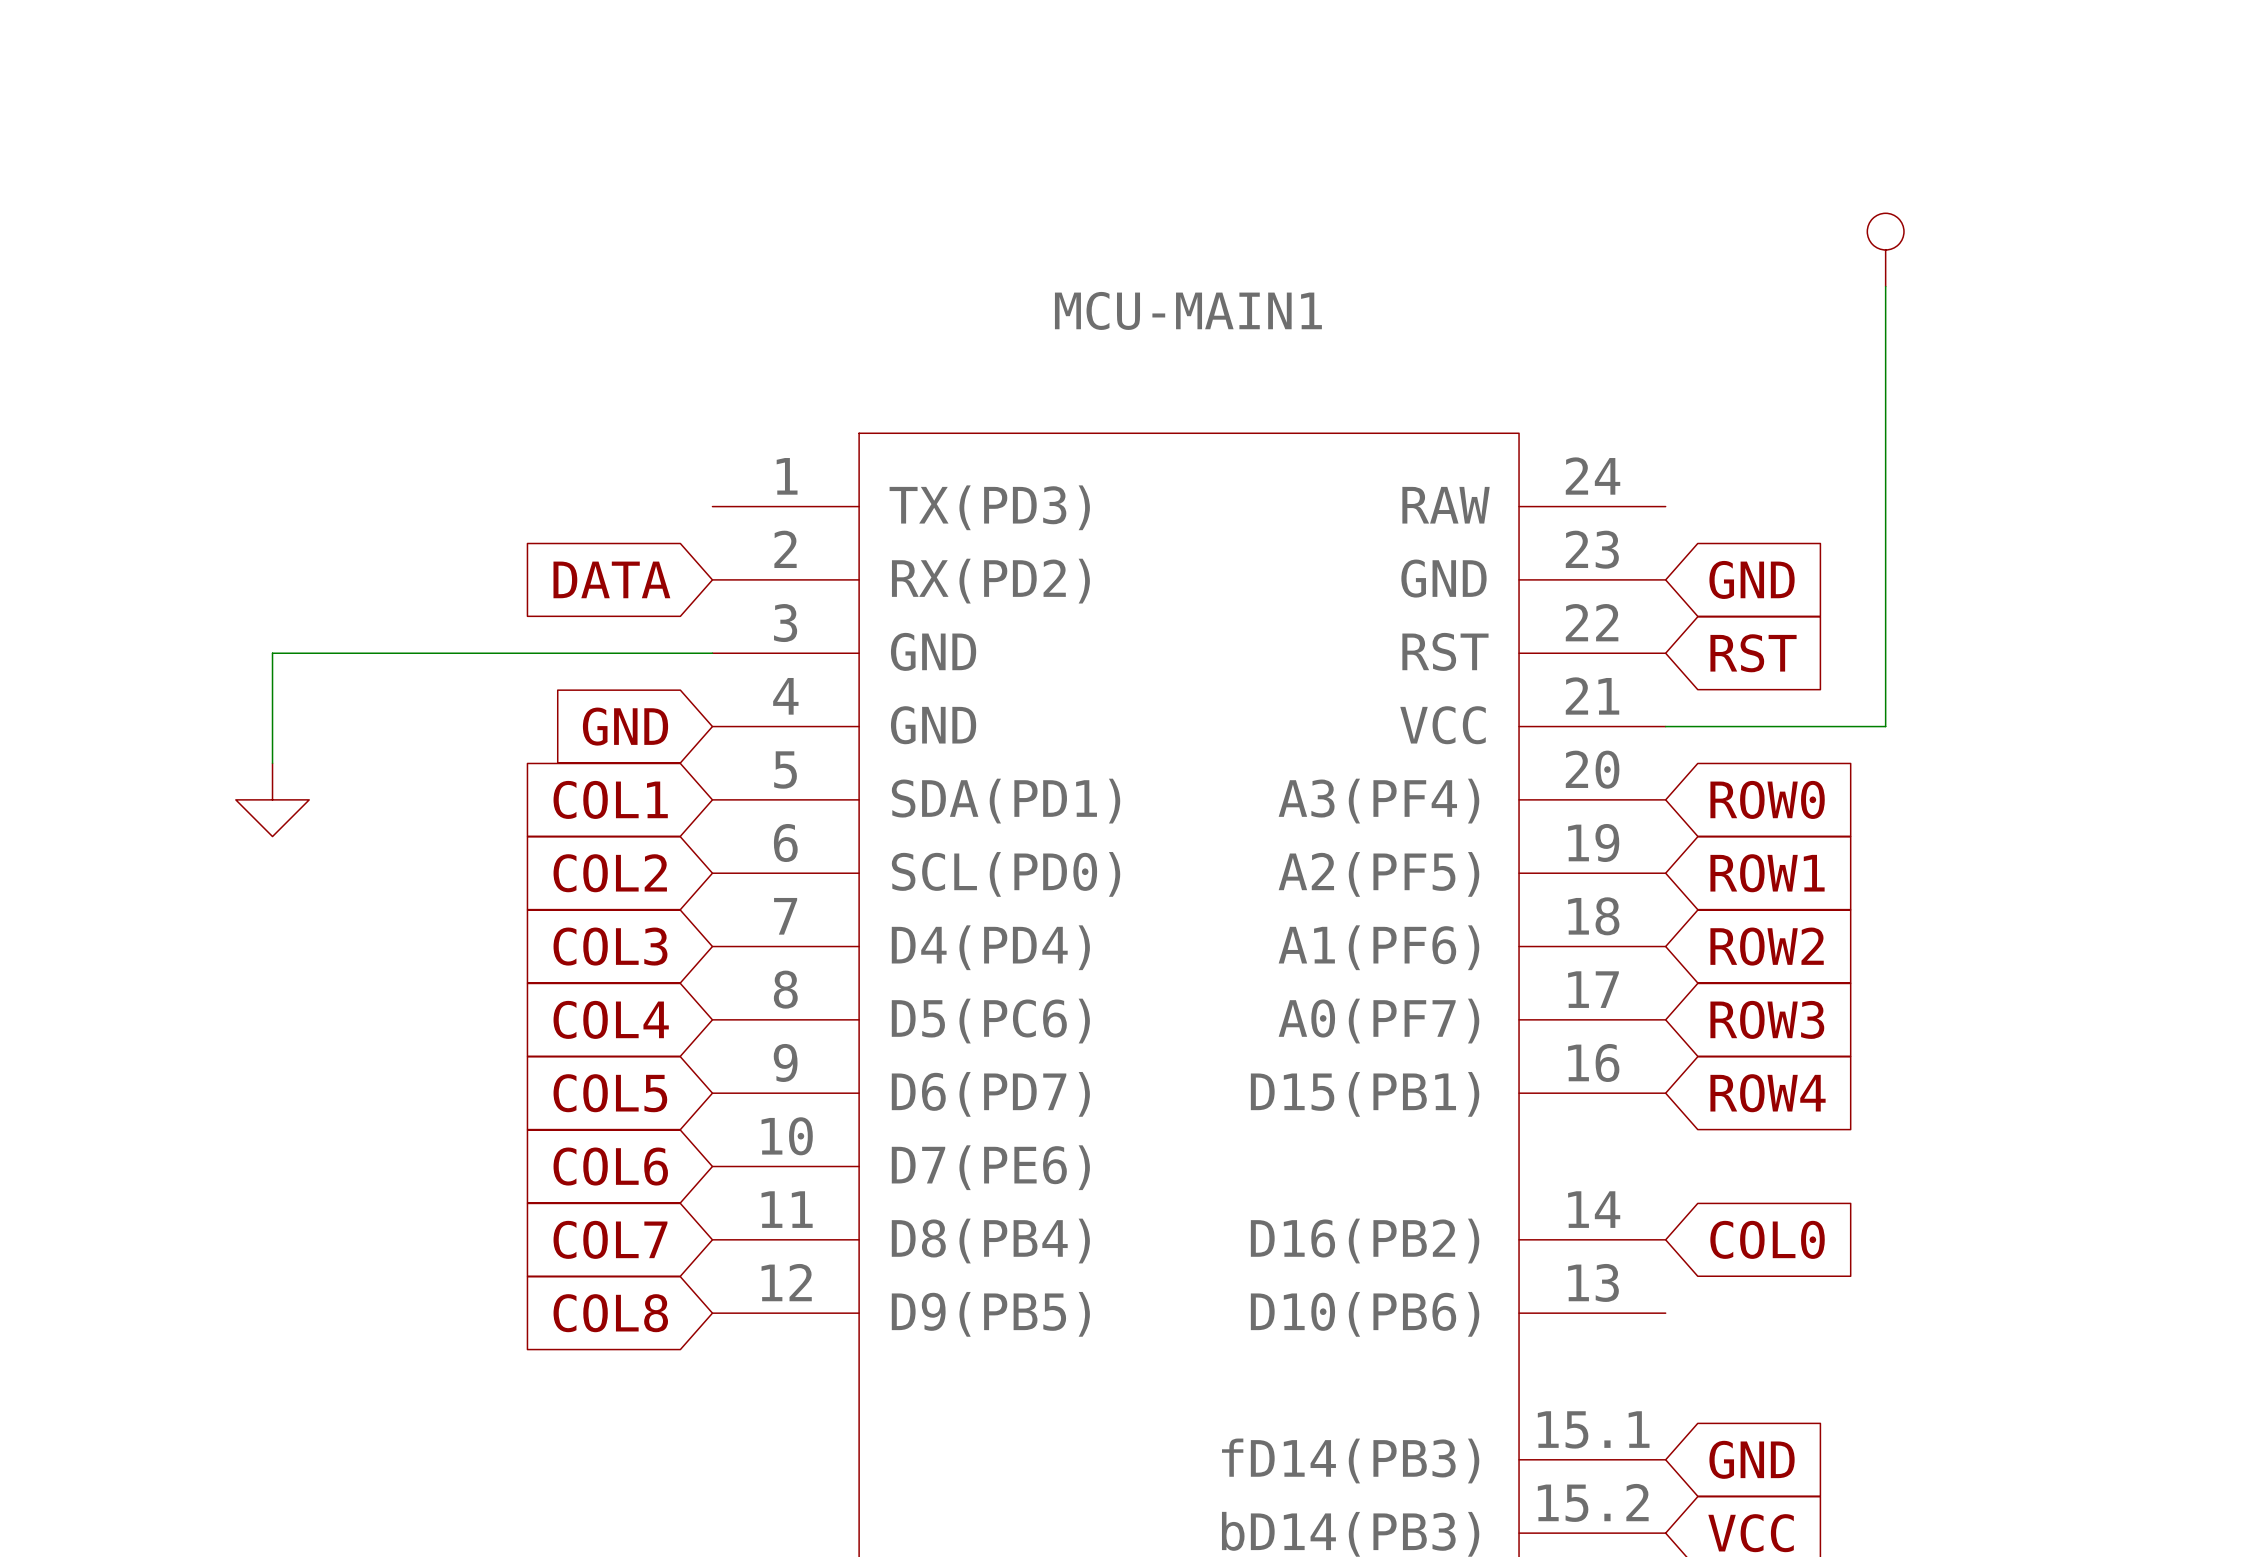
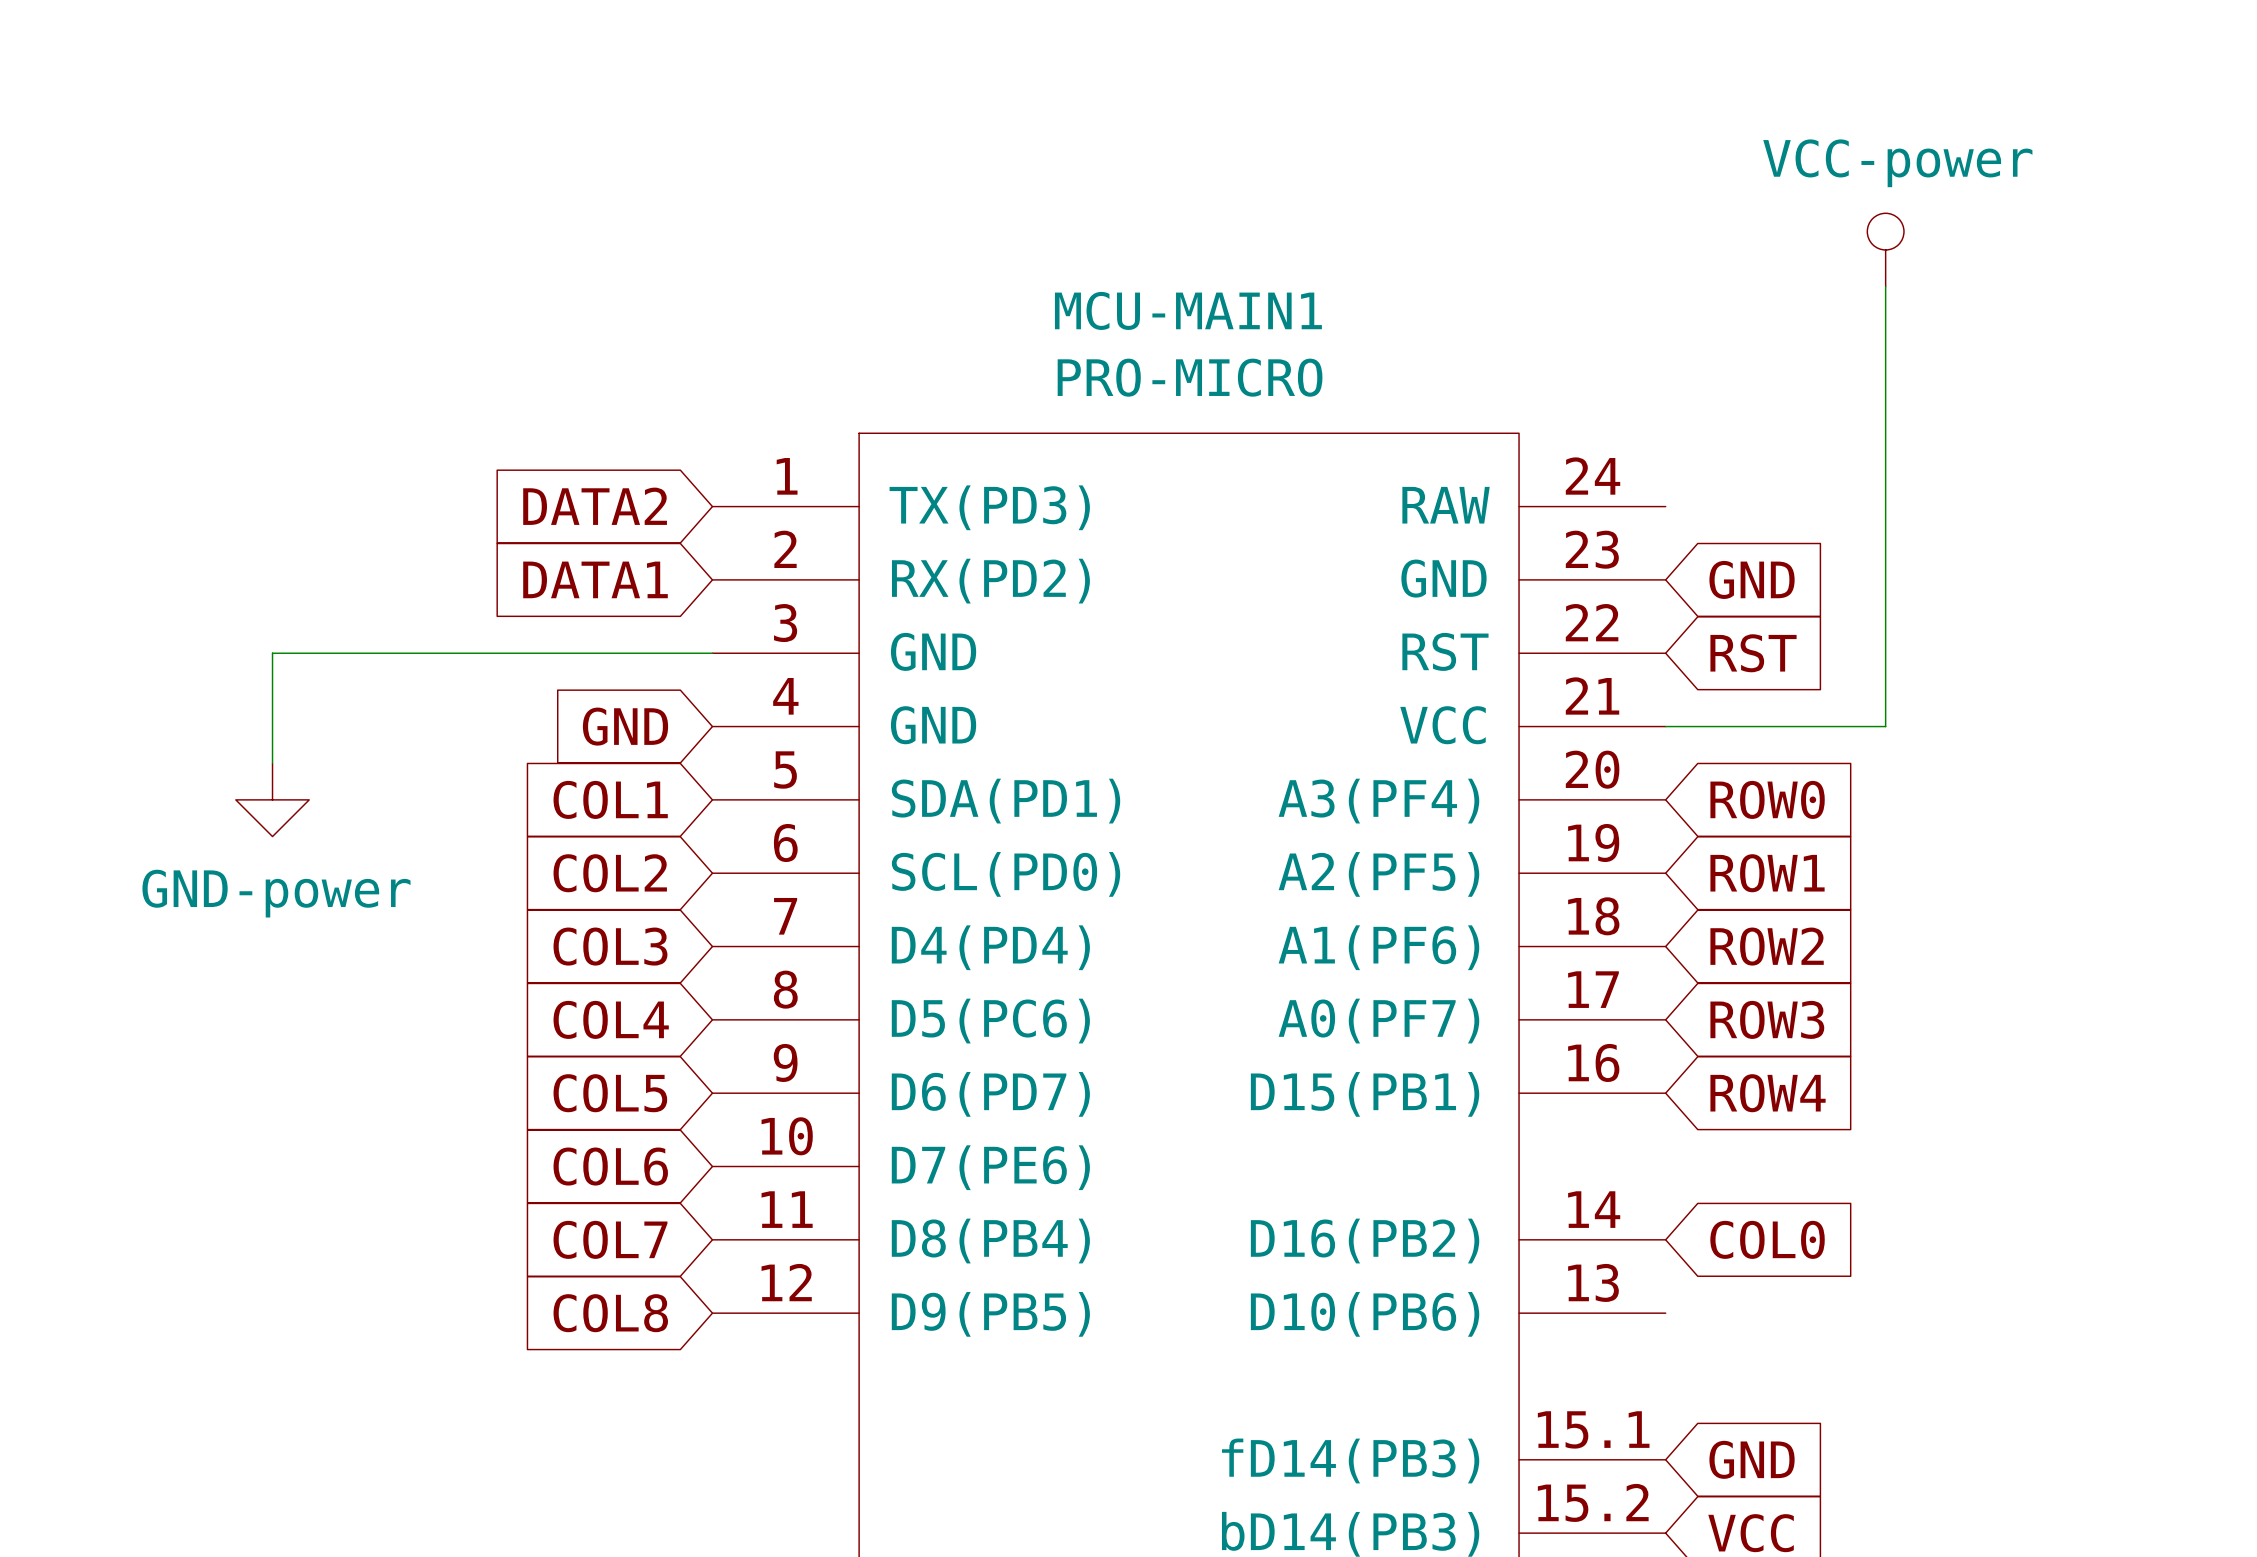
power symbol text: none -> VCC-power (1897, 163)
MCU-MAIN1 value: none -> PRO-MICRO (1190, 377)
global label: none -> DATA2 (595, 506)
global label: DATA (611, 579) -> DATA1 (595, 579)
power symbol text: none -> GND-power (276, 893)

